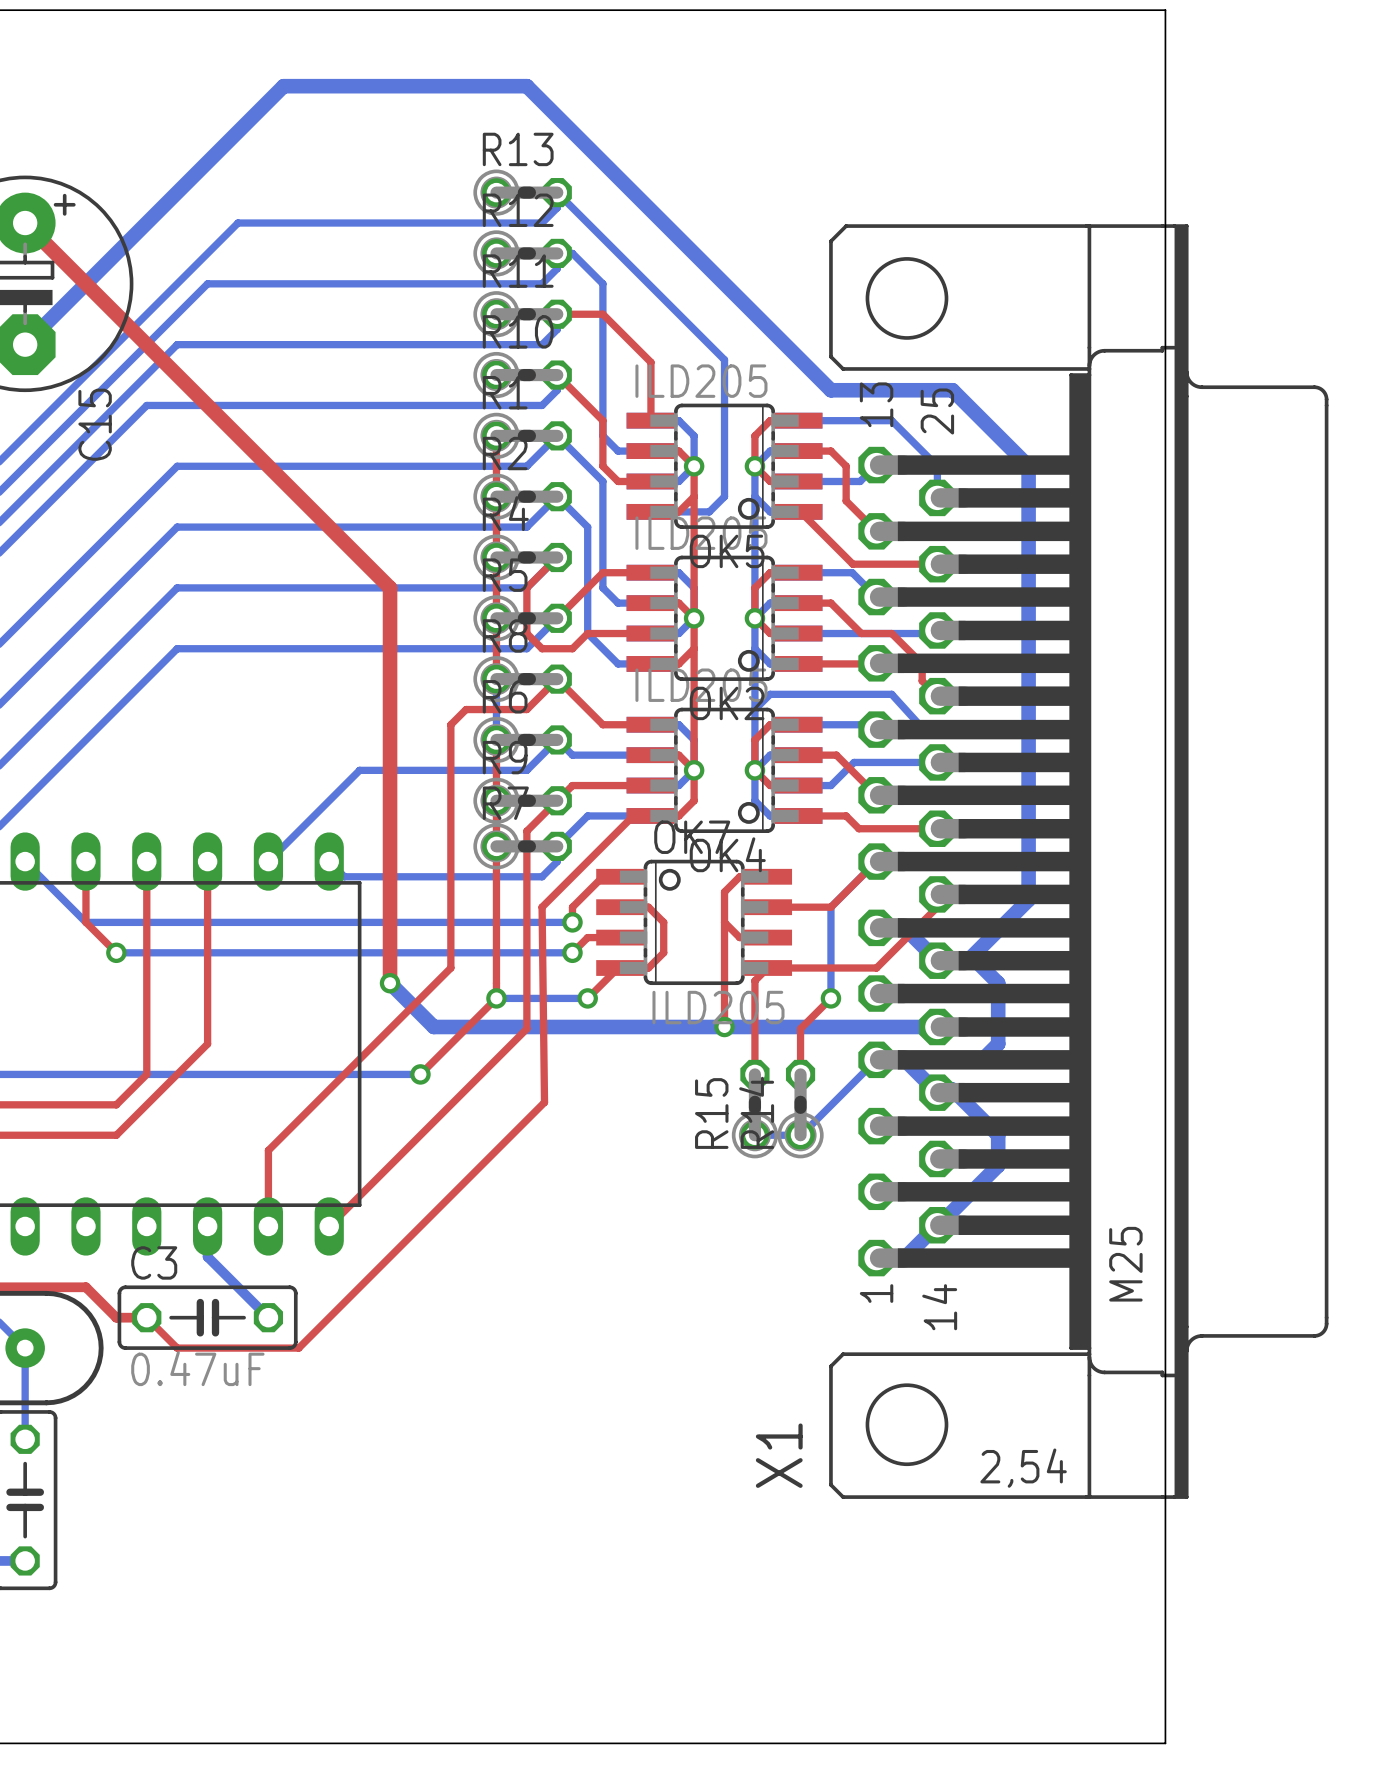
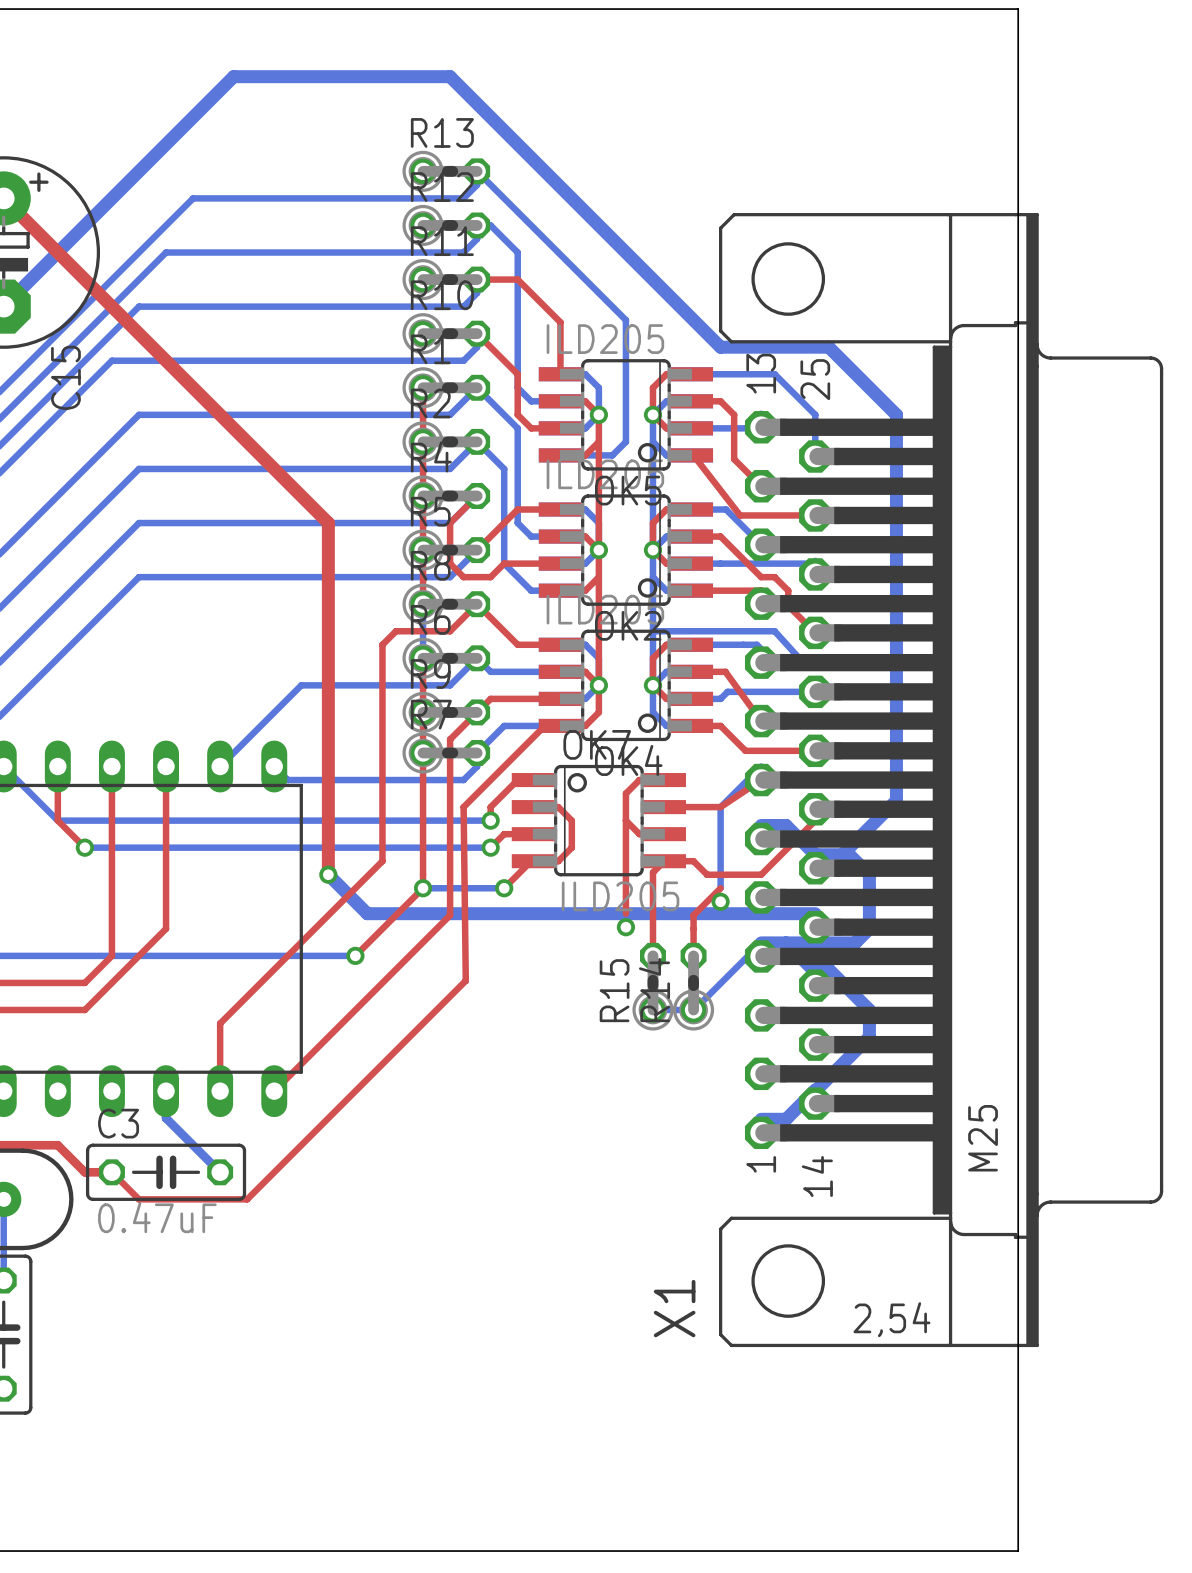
top track: (846, 500) (876, 531) -> (734, 445) (734, 459) (761, 486)
top track: (800, 511) (852, 564) (937, 564) -> (693, 455) (740, 515) (815, 515)
bottom track: (837, 572) (852, 572) (876, 597) -> (726, 509) (761, 544)
top track: (861, 633) (891, 633) (922, 663) (922, 680) (937, 696) -> (747, 563) (761, 577) (774, 577) (788, 590) (788, 605) (815, 632)
bottom track: (754, 709) (770, 694) (891, 694) (922, 727) (1028, 727) -> (652, 631) (774, 631) (801, 661) (896, 661)
top track: (836, 755) (876, 795) -> (725, 671) (761, 721)
bottom track: (937, 762) (854, 762) (838, 777) -> (815, 691) (727, 691)
top track: (830, 815) (846, 815) (858, 828) (937, 828) -> (720, 725) (745, 750) (815, 750)
top track: (876, 861) (830, 907) -> (761, 780) (720, 807)
X1 position: (1078, 861) -> (941, 780)
top track: (937, 894) (937, 907) (876, 968) (800, 968) -> (815, 809) (815, 820) (761, 874) (707, 874) (693, 861)
via position: (830, 998) -> (720, 901)
via position: (724, 1026) -> (625, 927)

